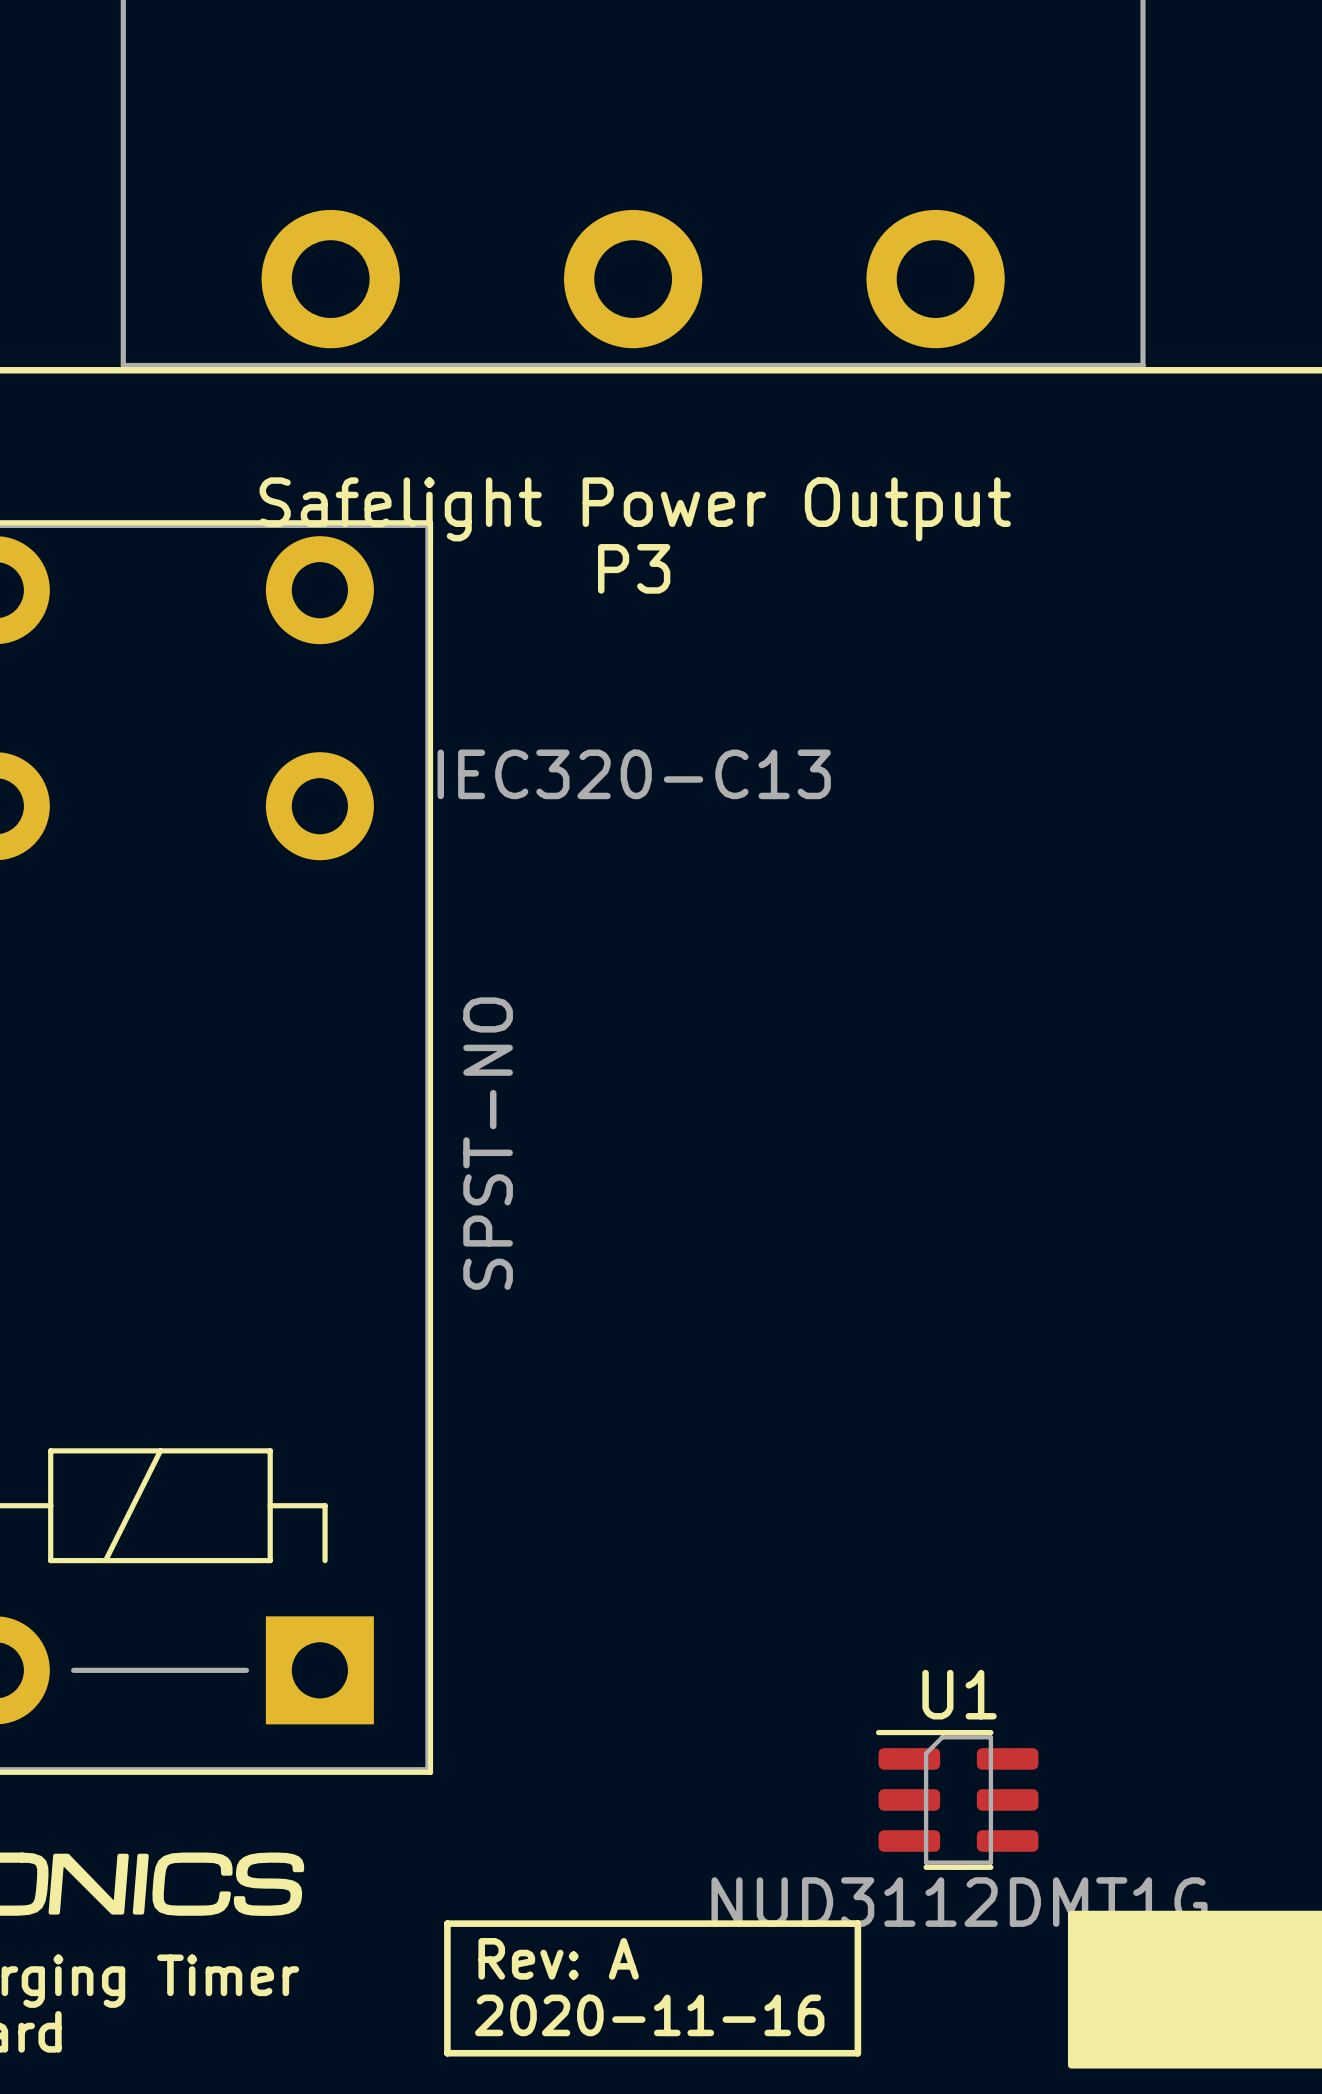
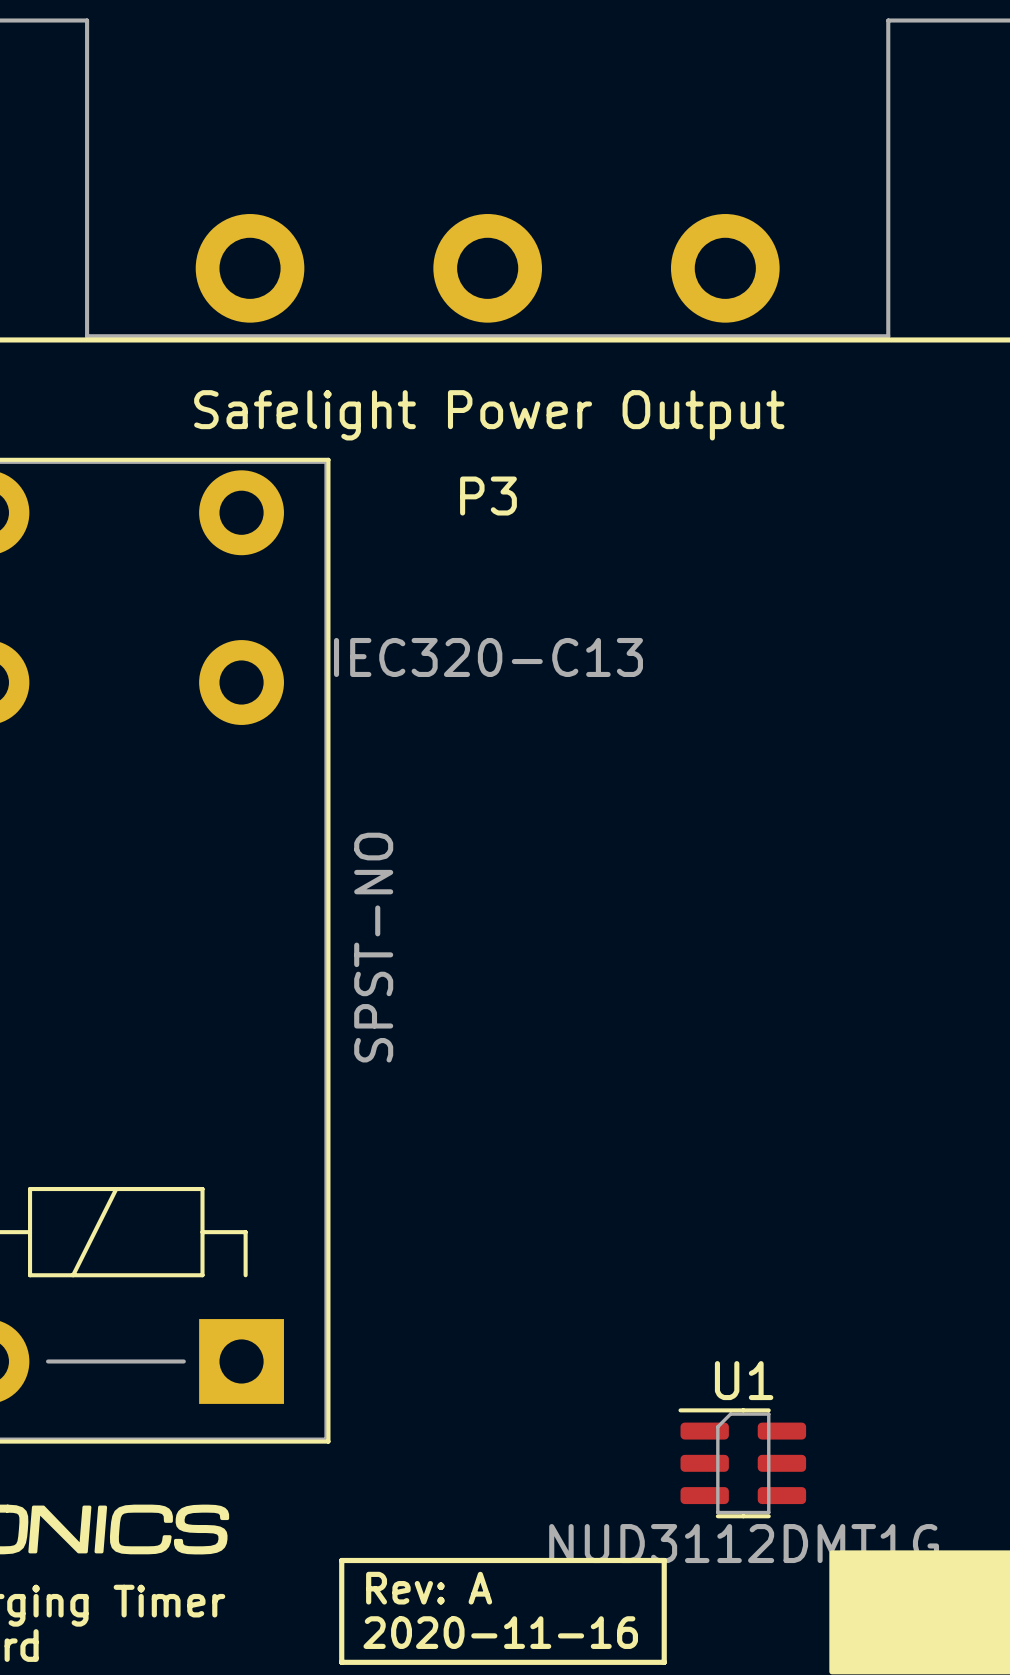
text position: Safelight Power Output (635, 509) -> Safelight Power Output (489, 415)

